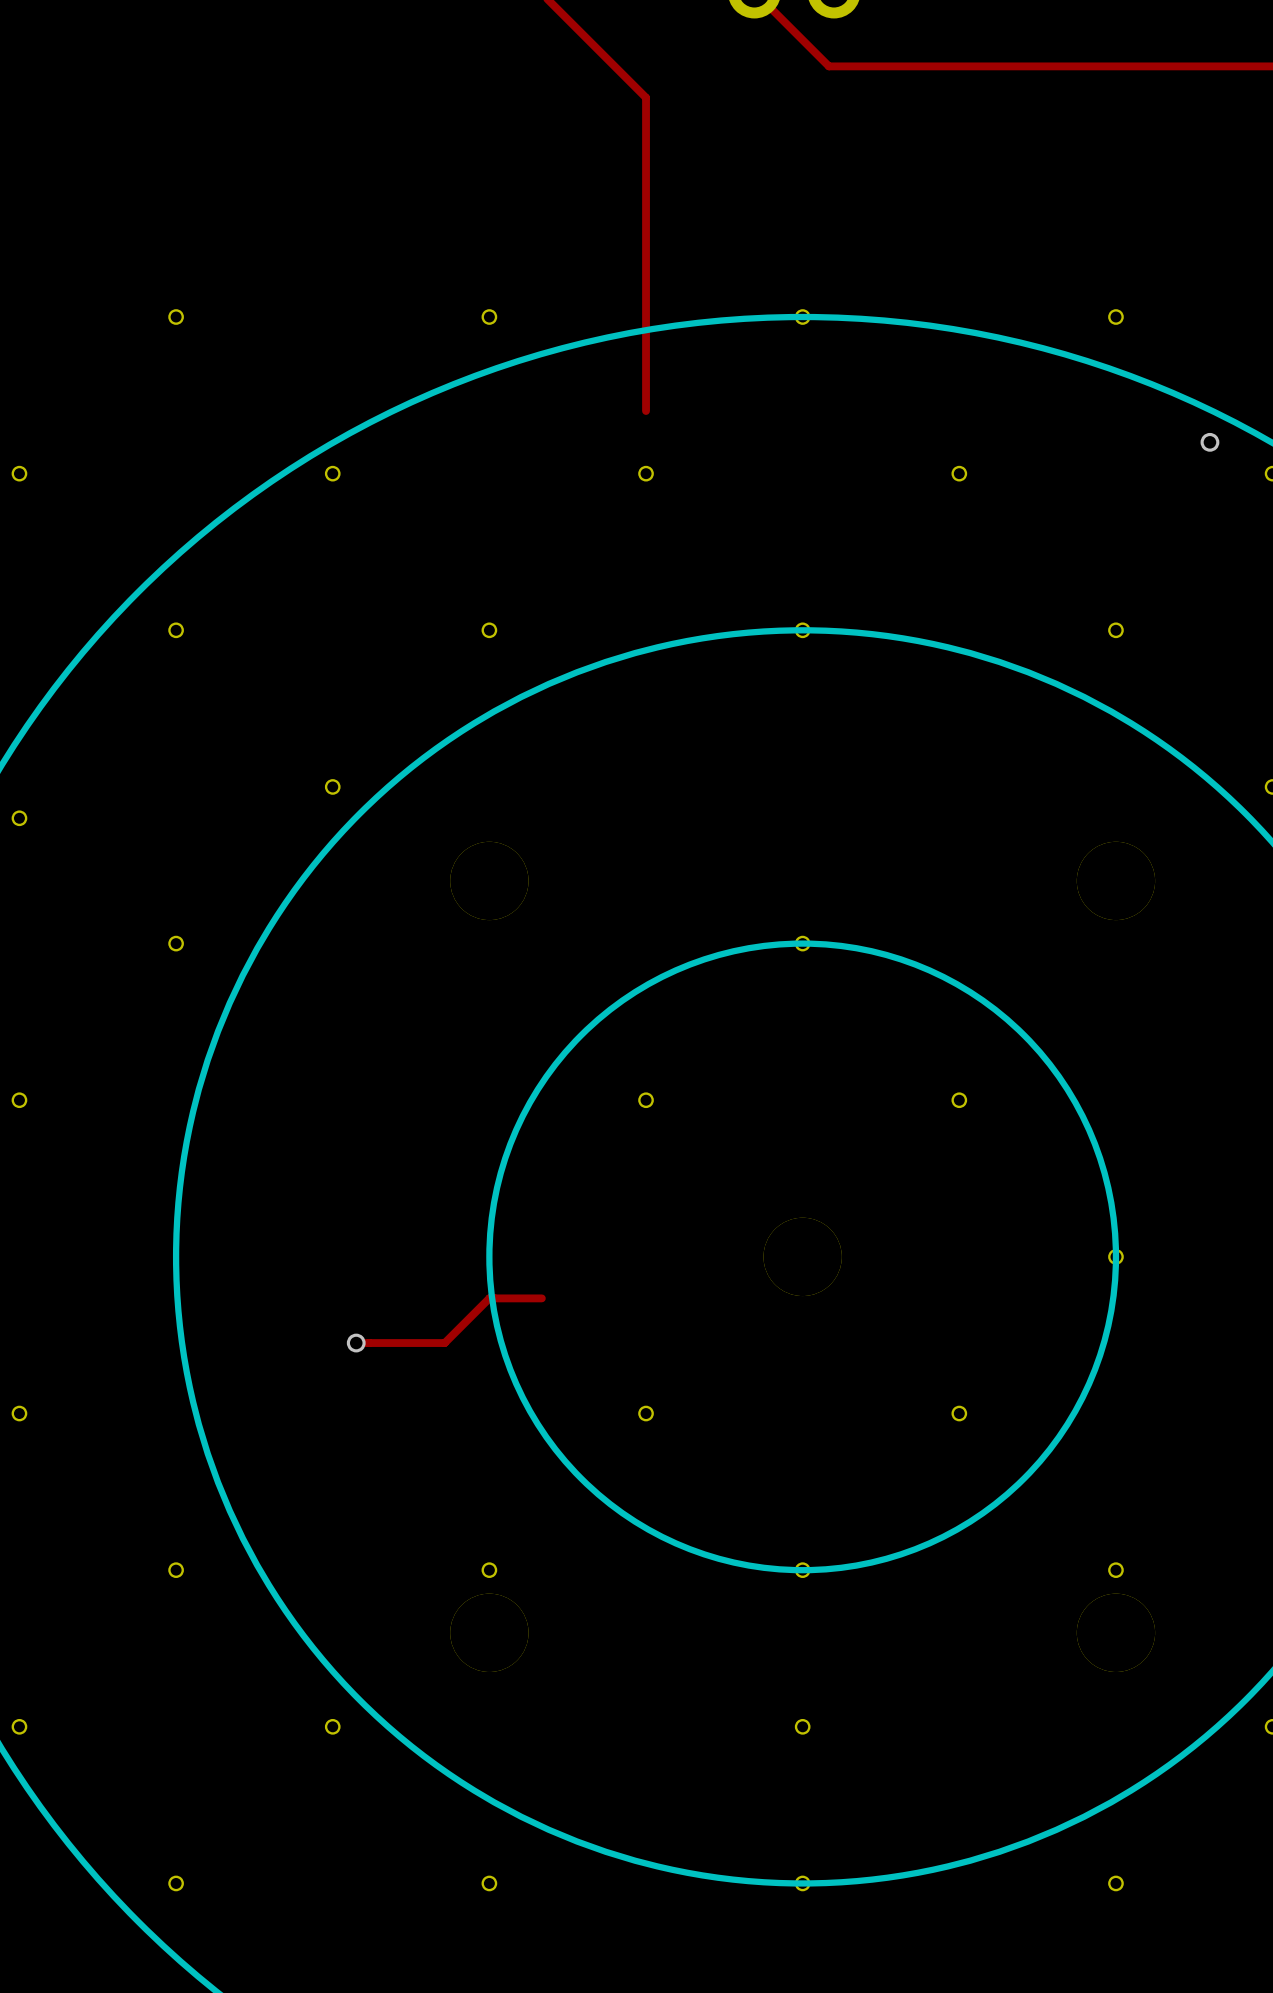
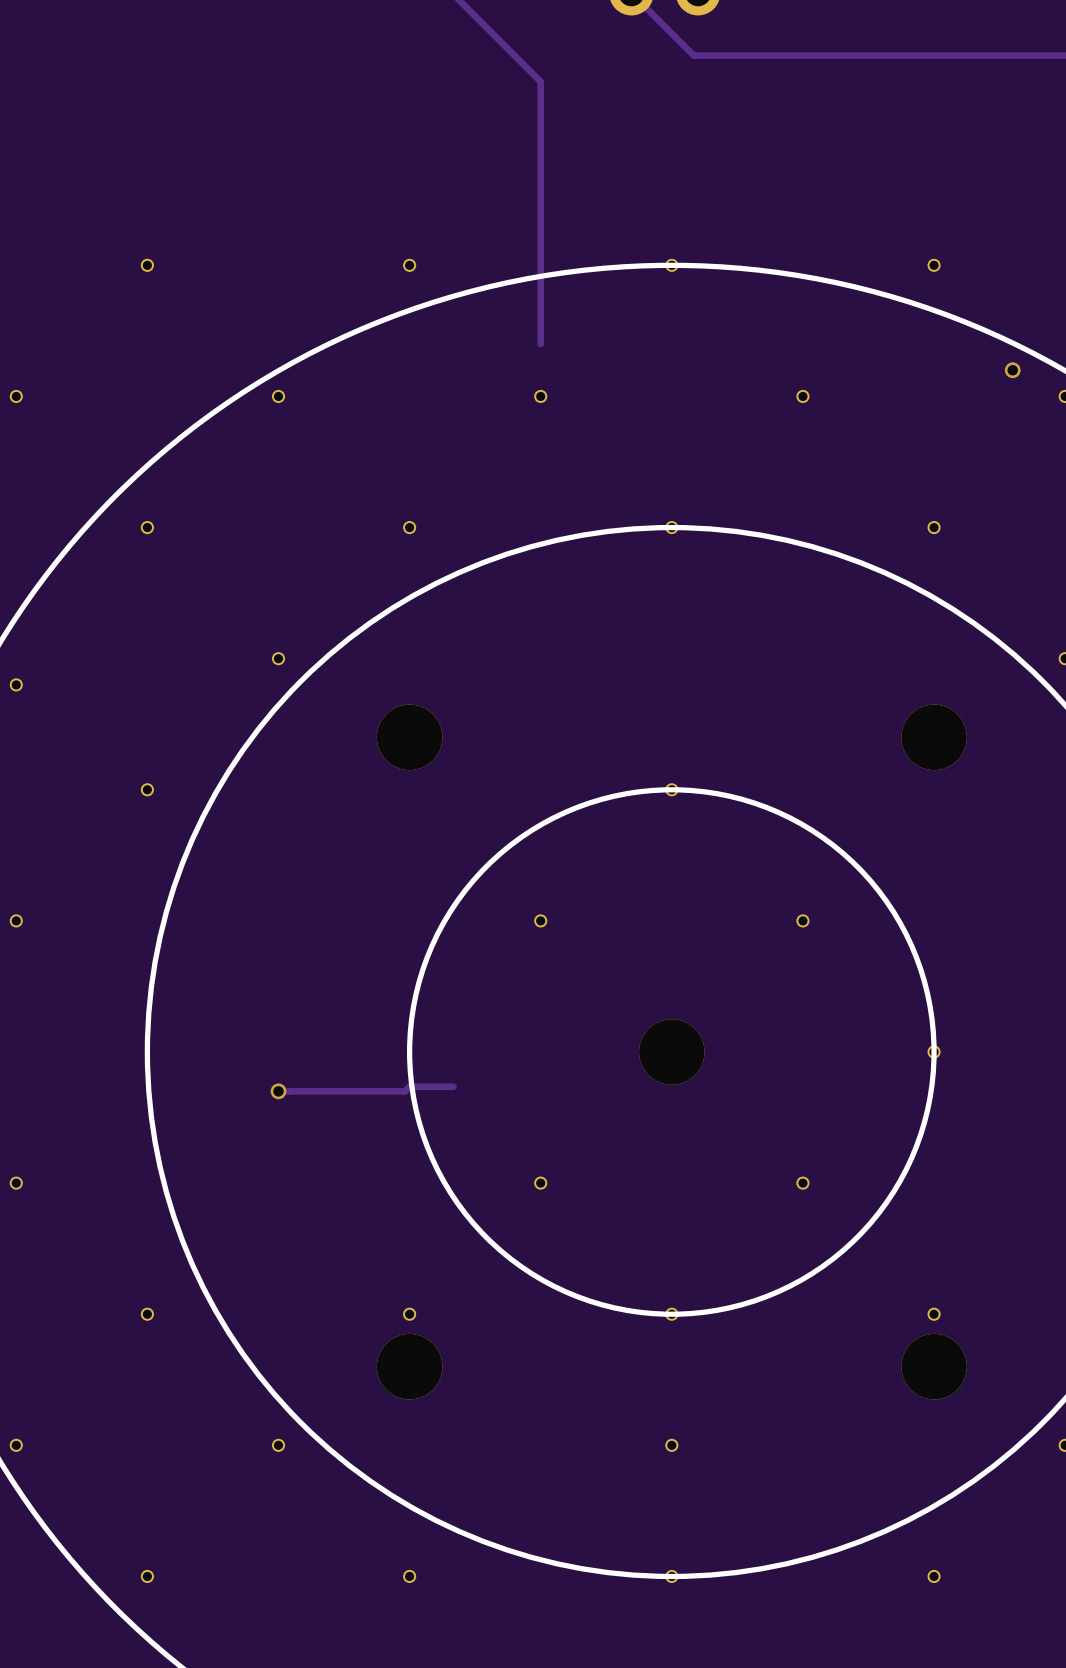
track: (483, 1303) (444, 1343) (356, 1343) -> (405, 1091) (278, 1091)
via position: (356, 1343) -> (278, 1091)

